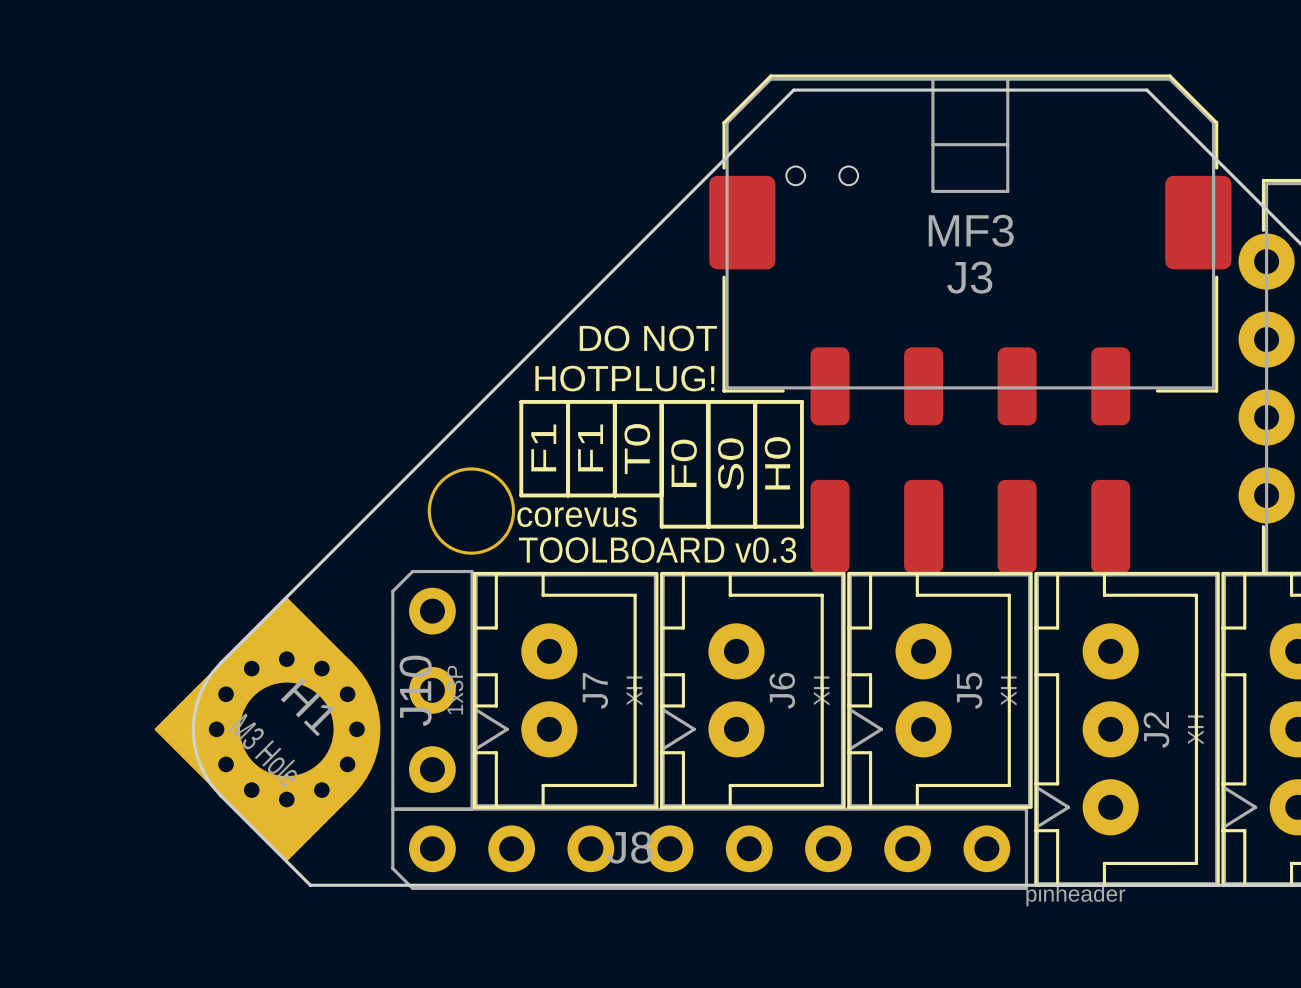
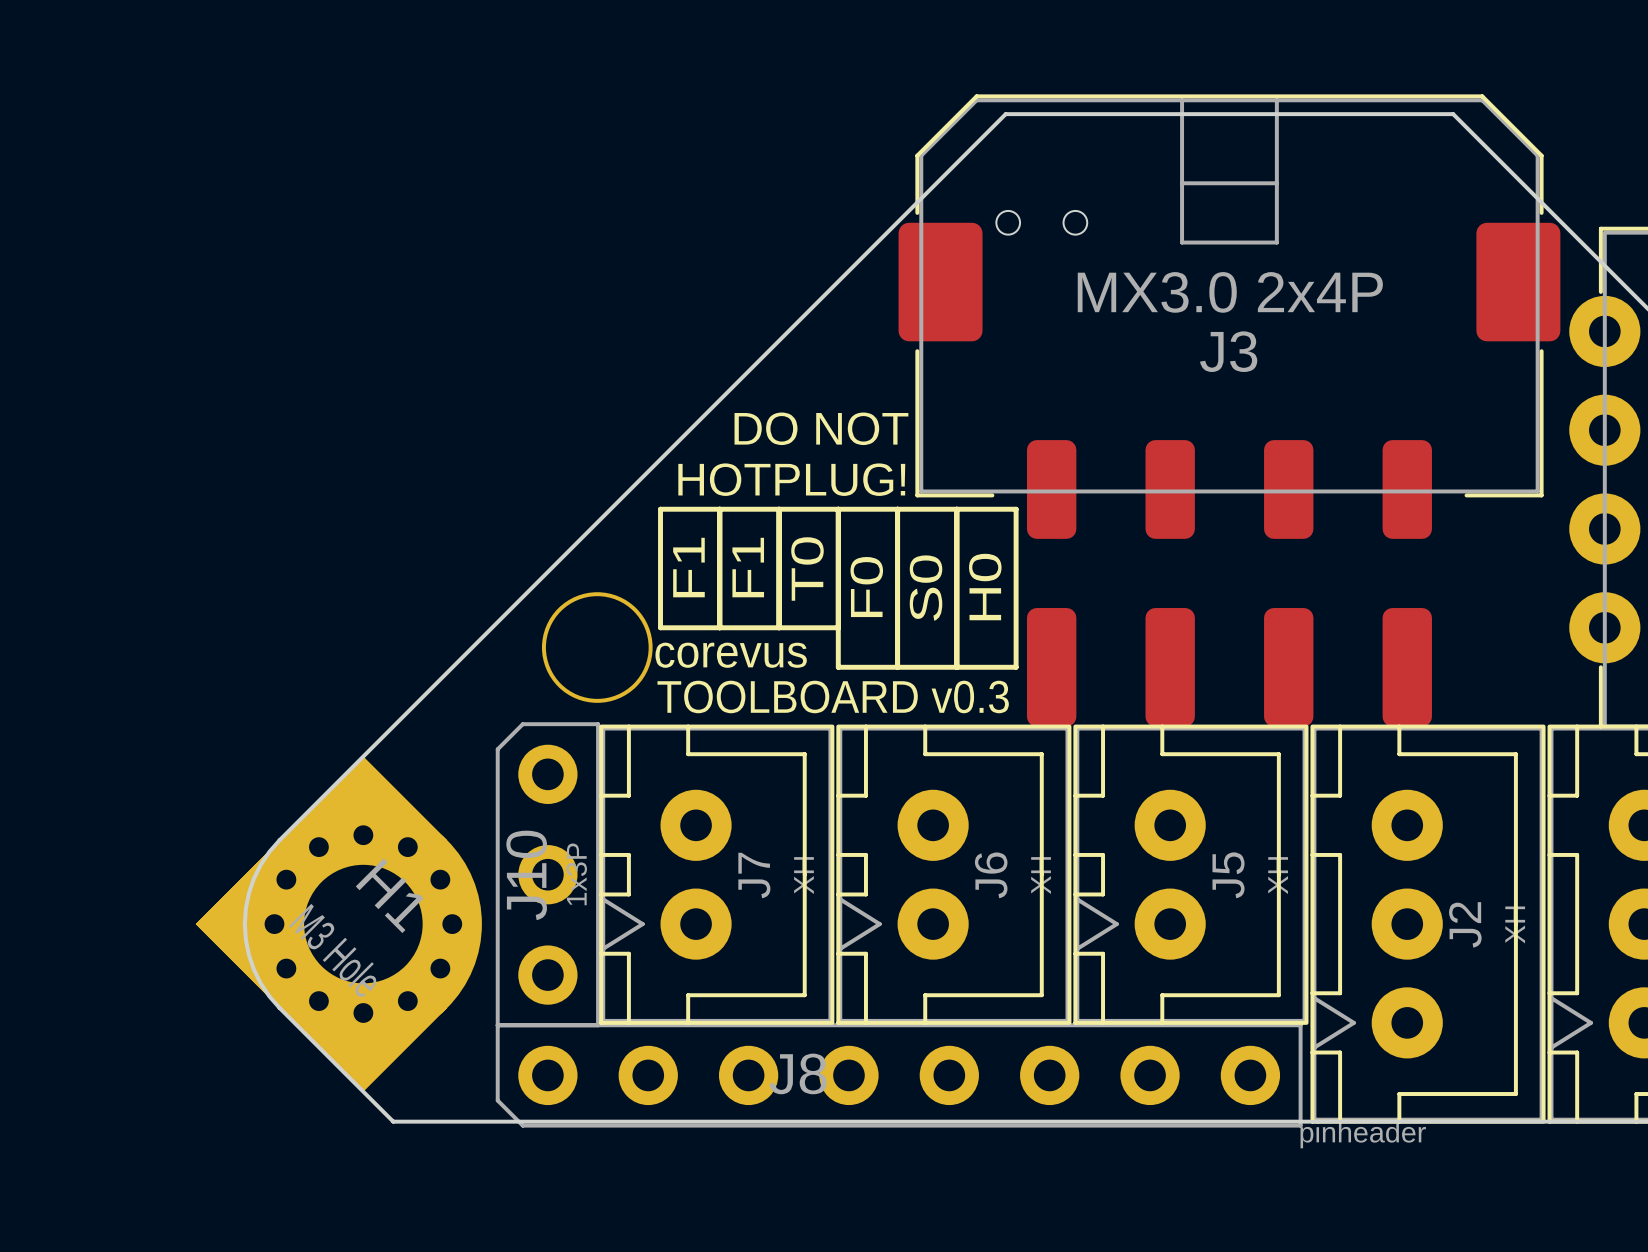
J3 value: MF3 (971, 230) -> MX3.0 2x4P (1230, 292)

